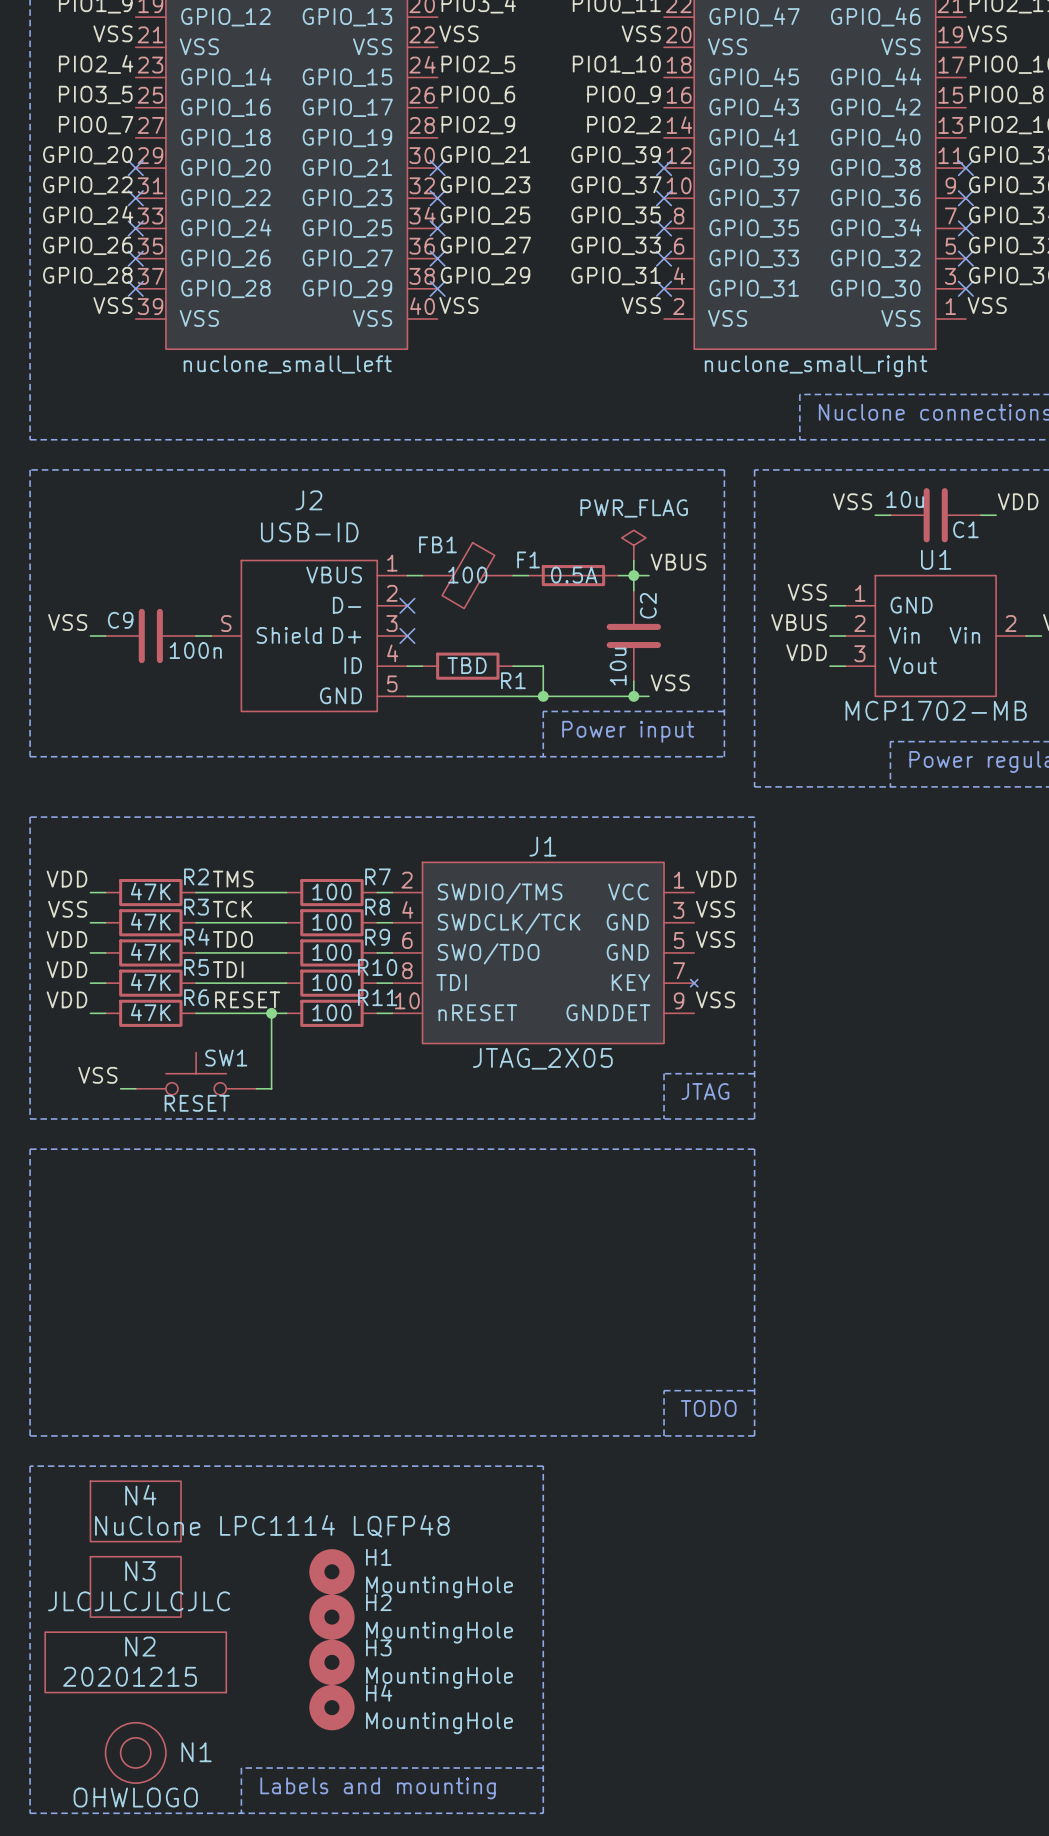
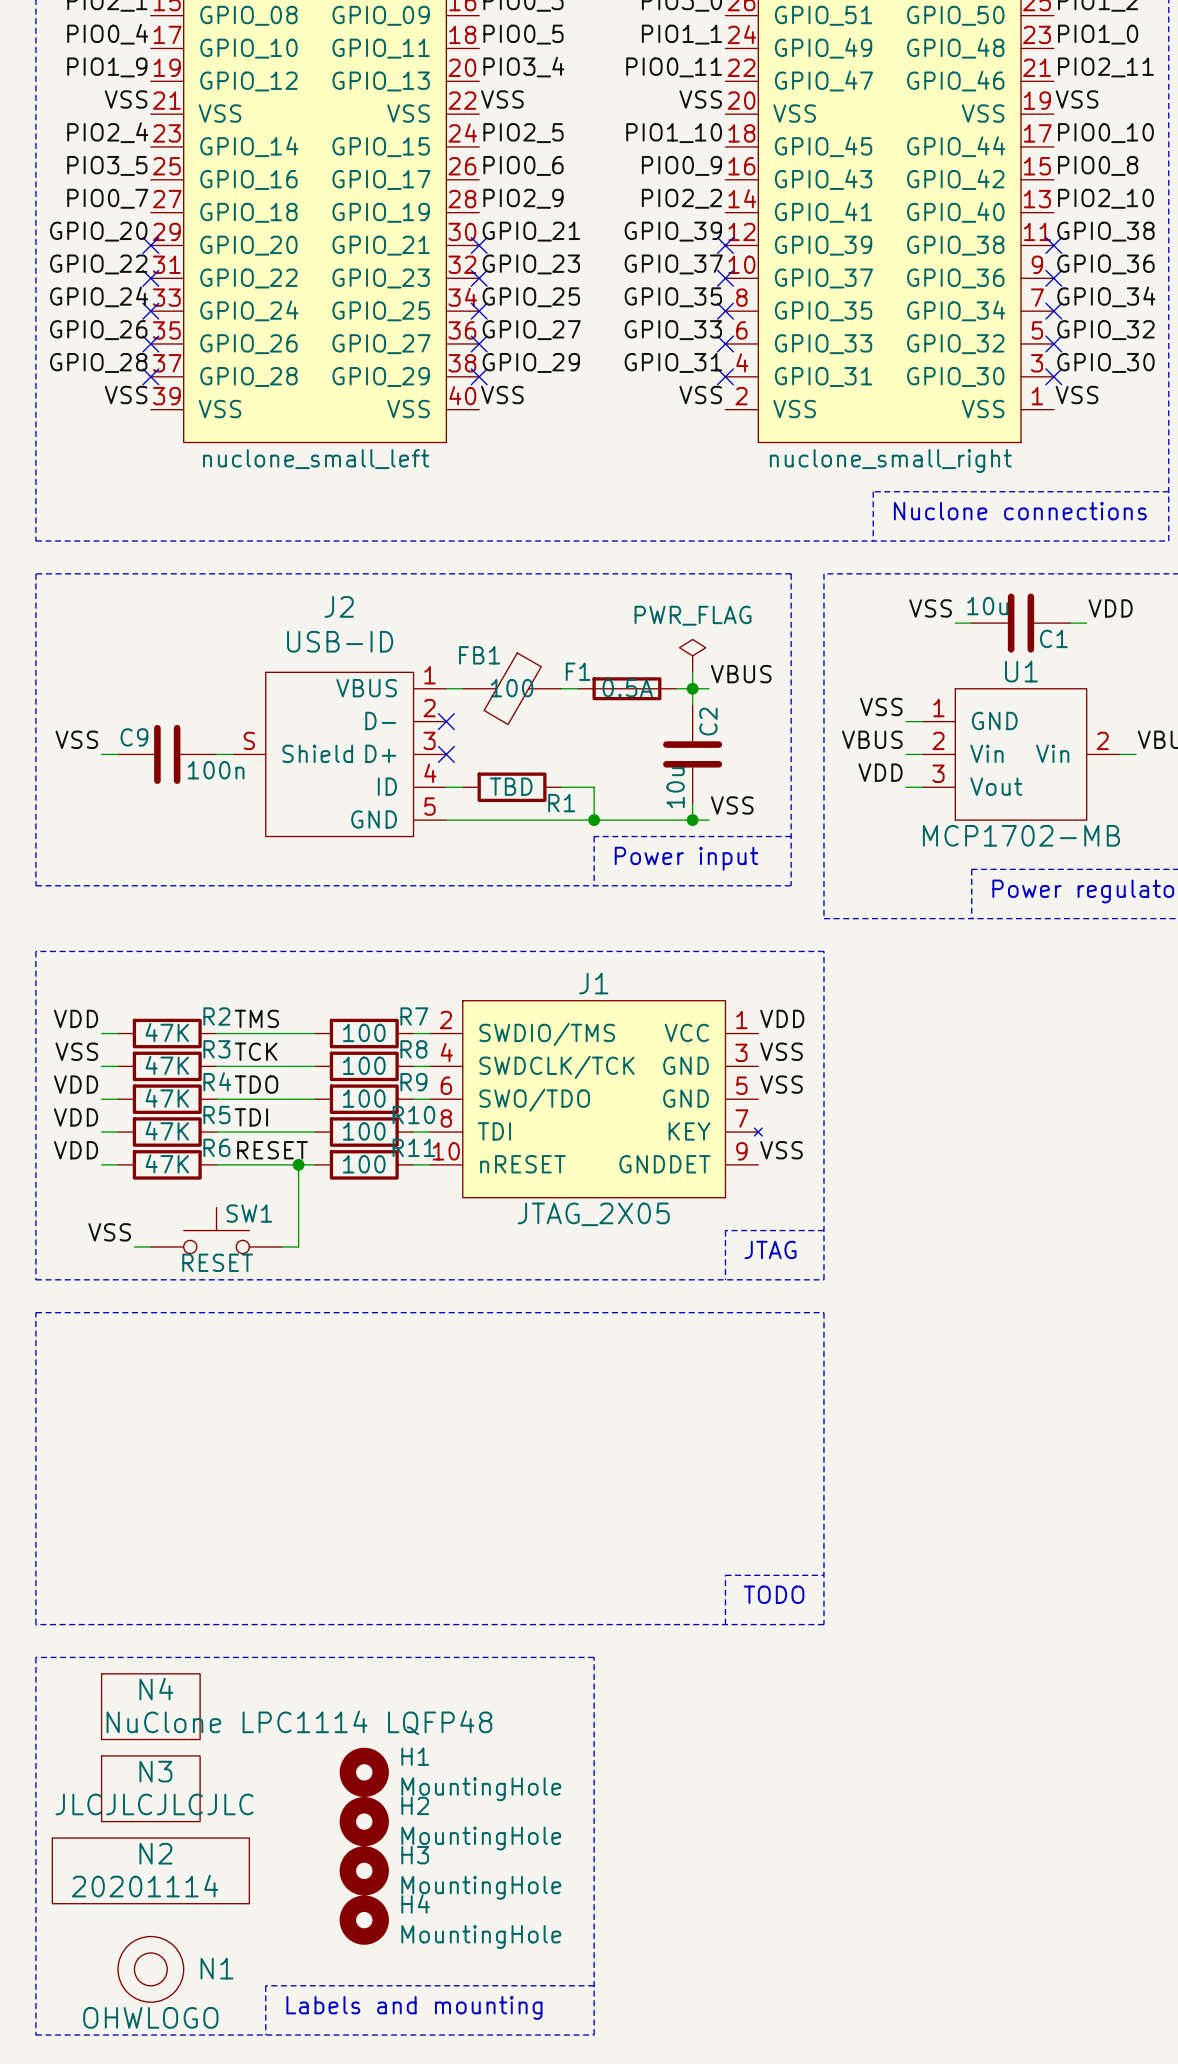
N2 value: 20201215 (130, 1676) -> 20201114 (145, 1886)

